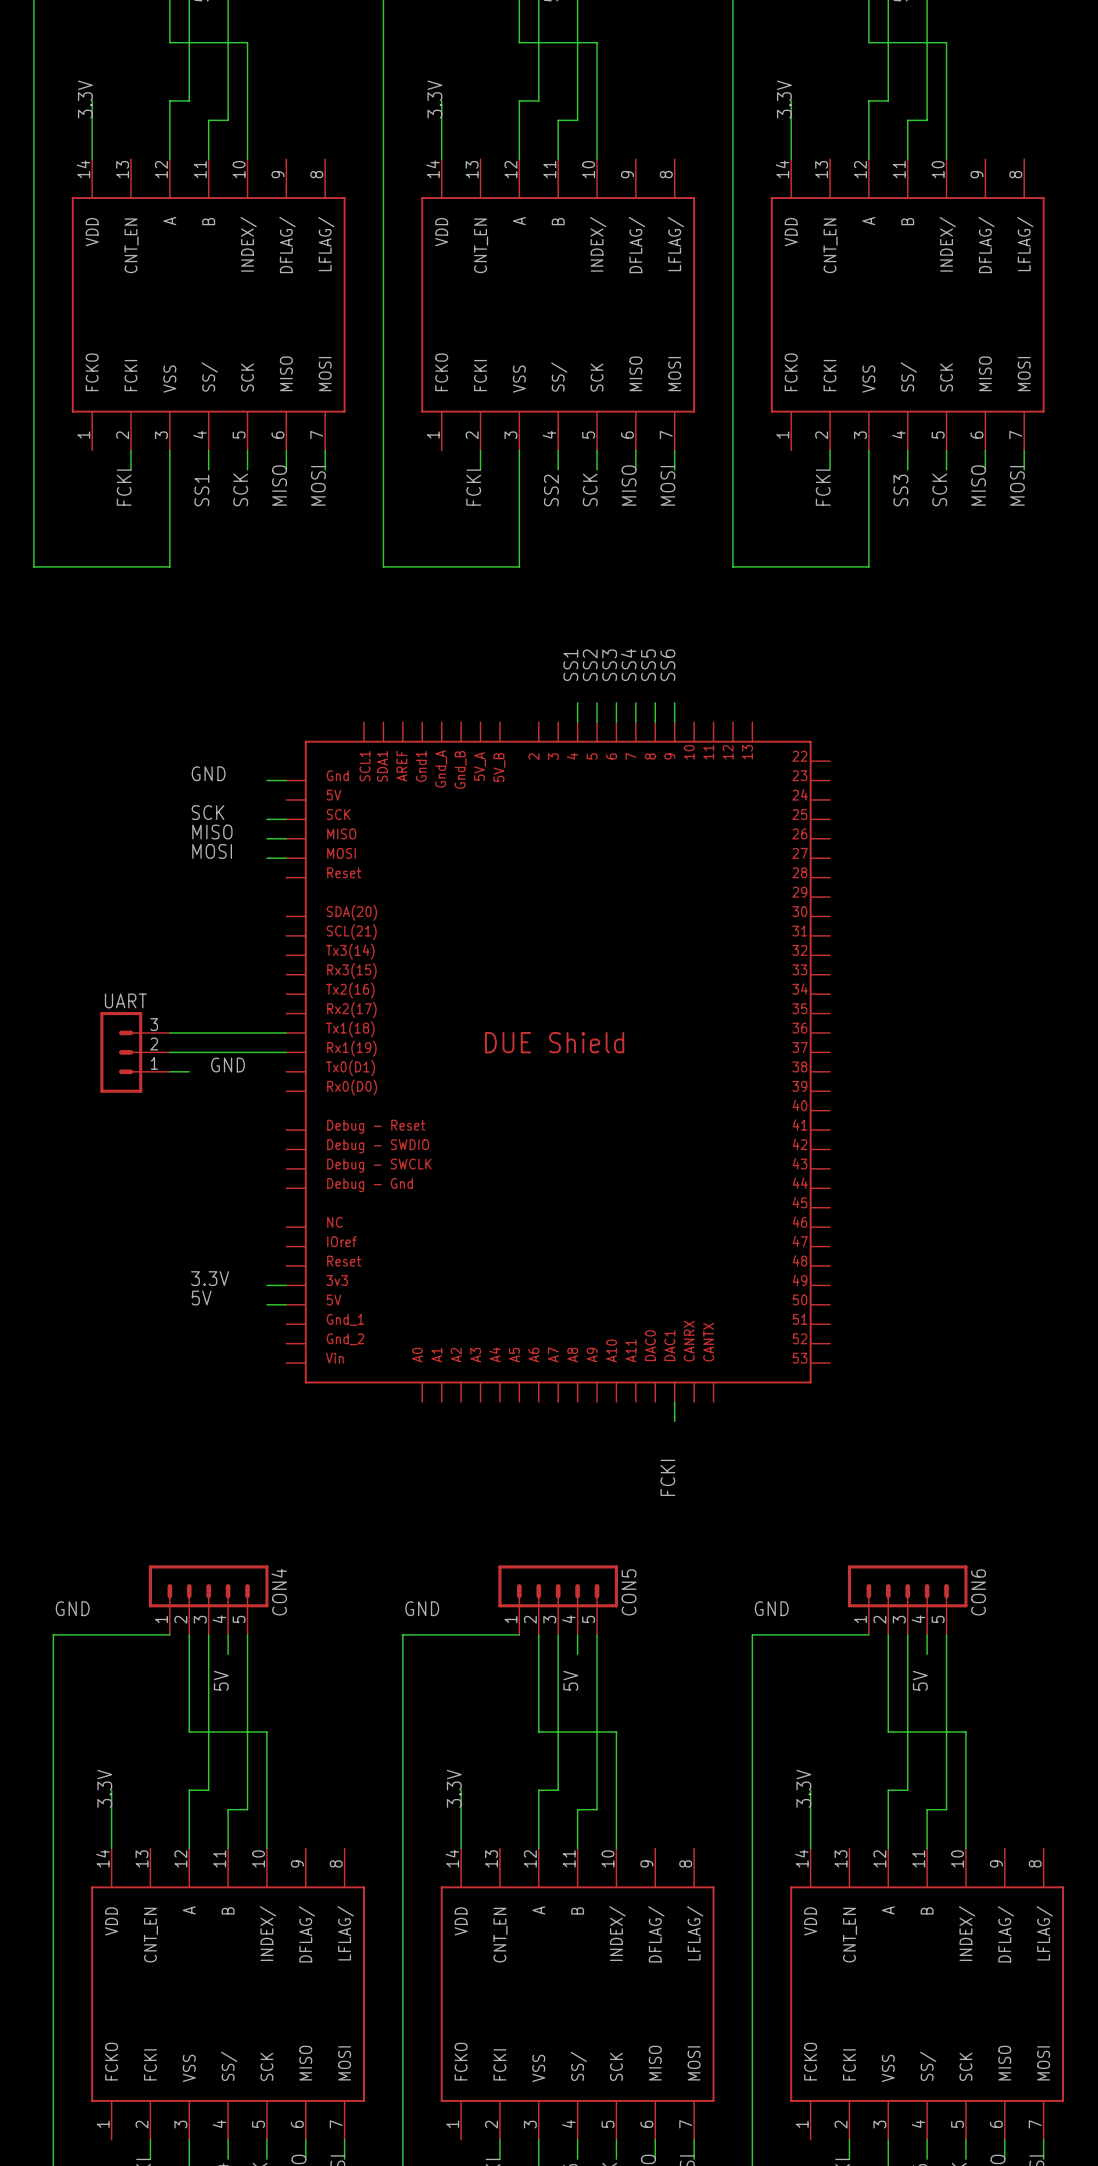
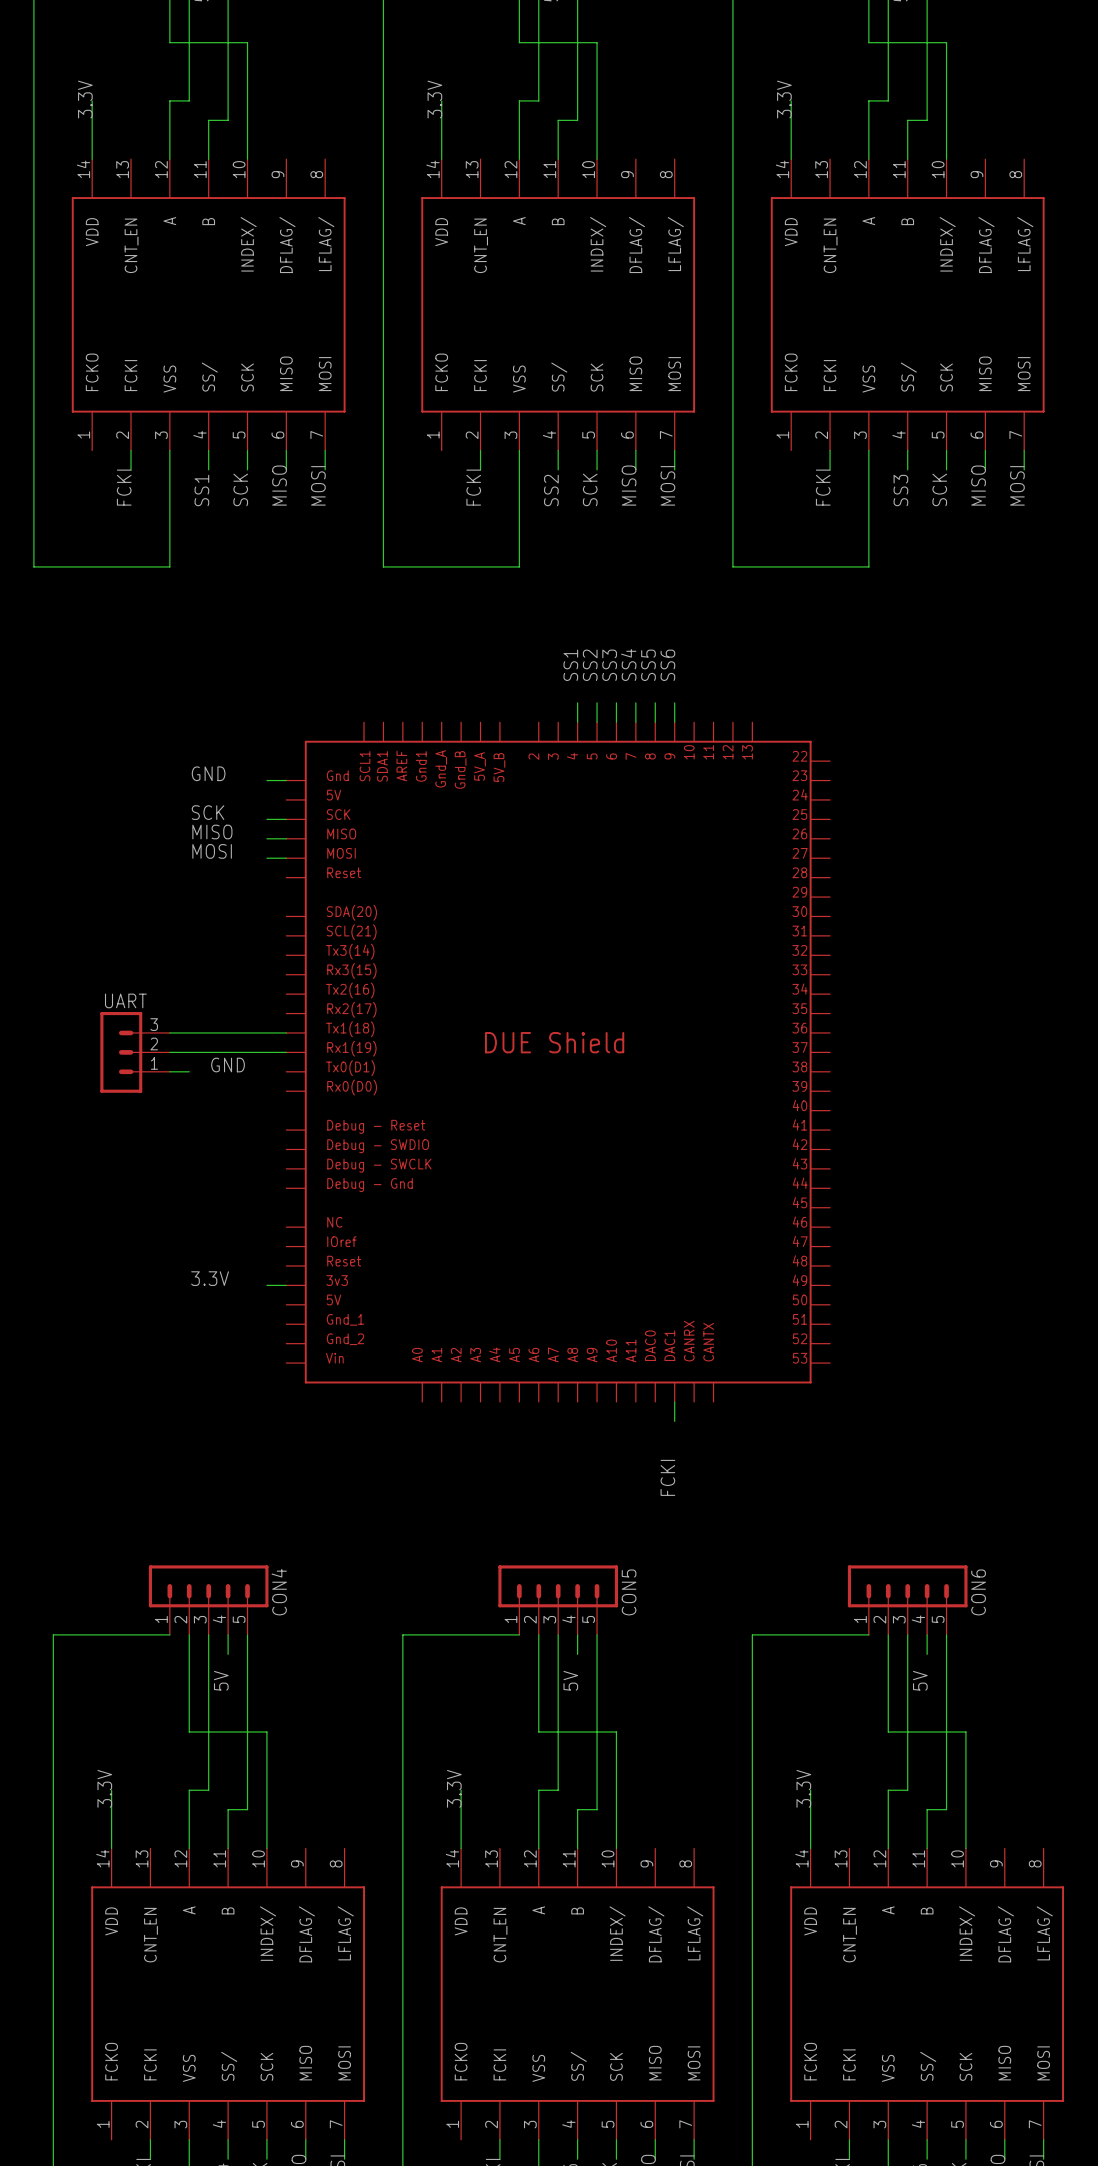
label: 5V (201, 1298) -> none
wire: (266, 1304) (286, 1304) -> none
label: GND (72, 1608) -> none
label: GND (422, 1608) -> none
label: GND (771, 1608) -> none

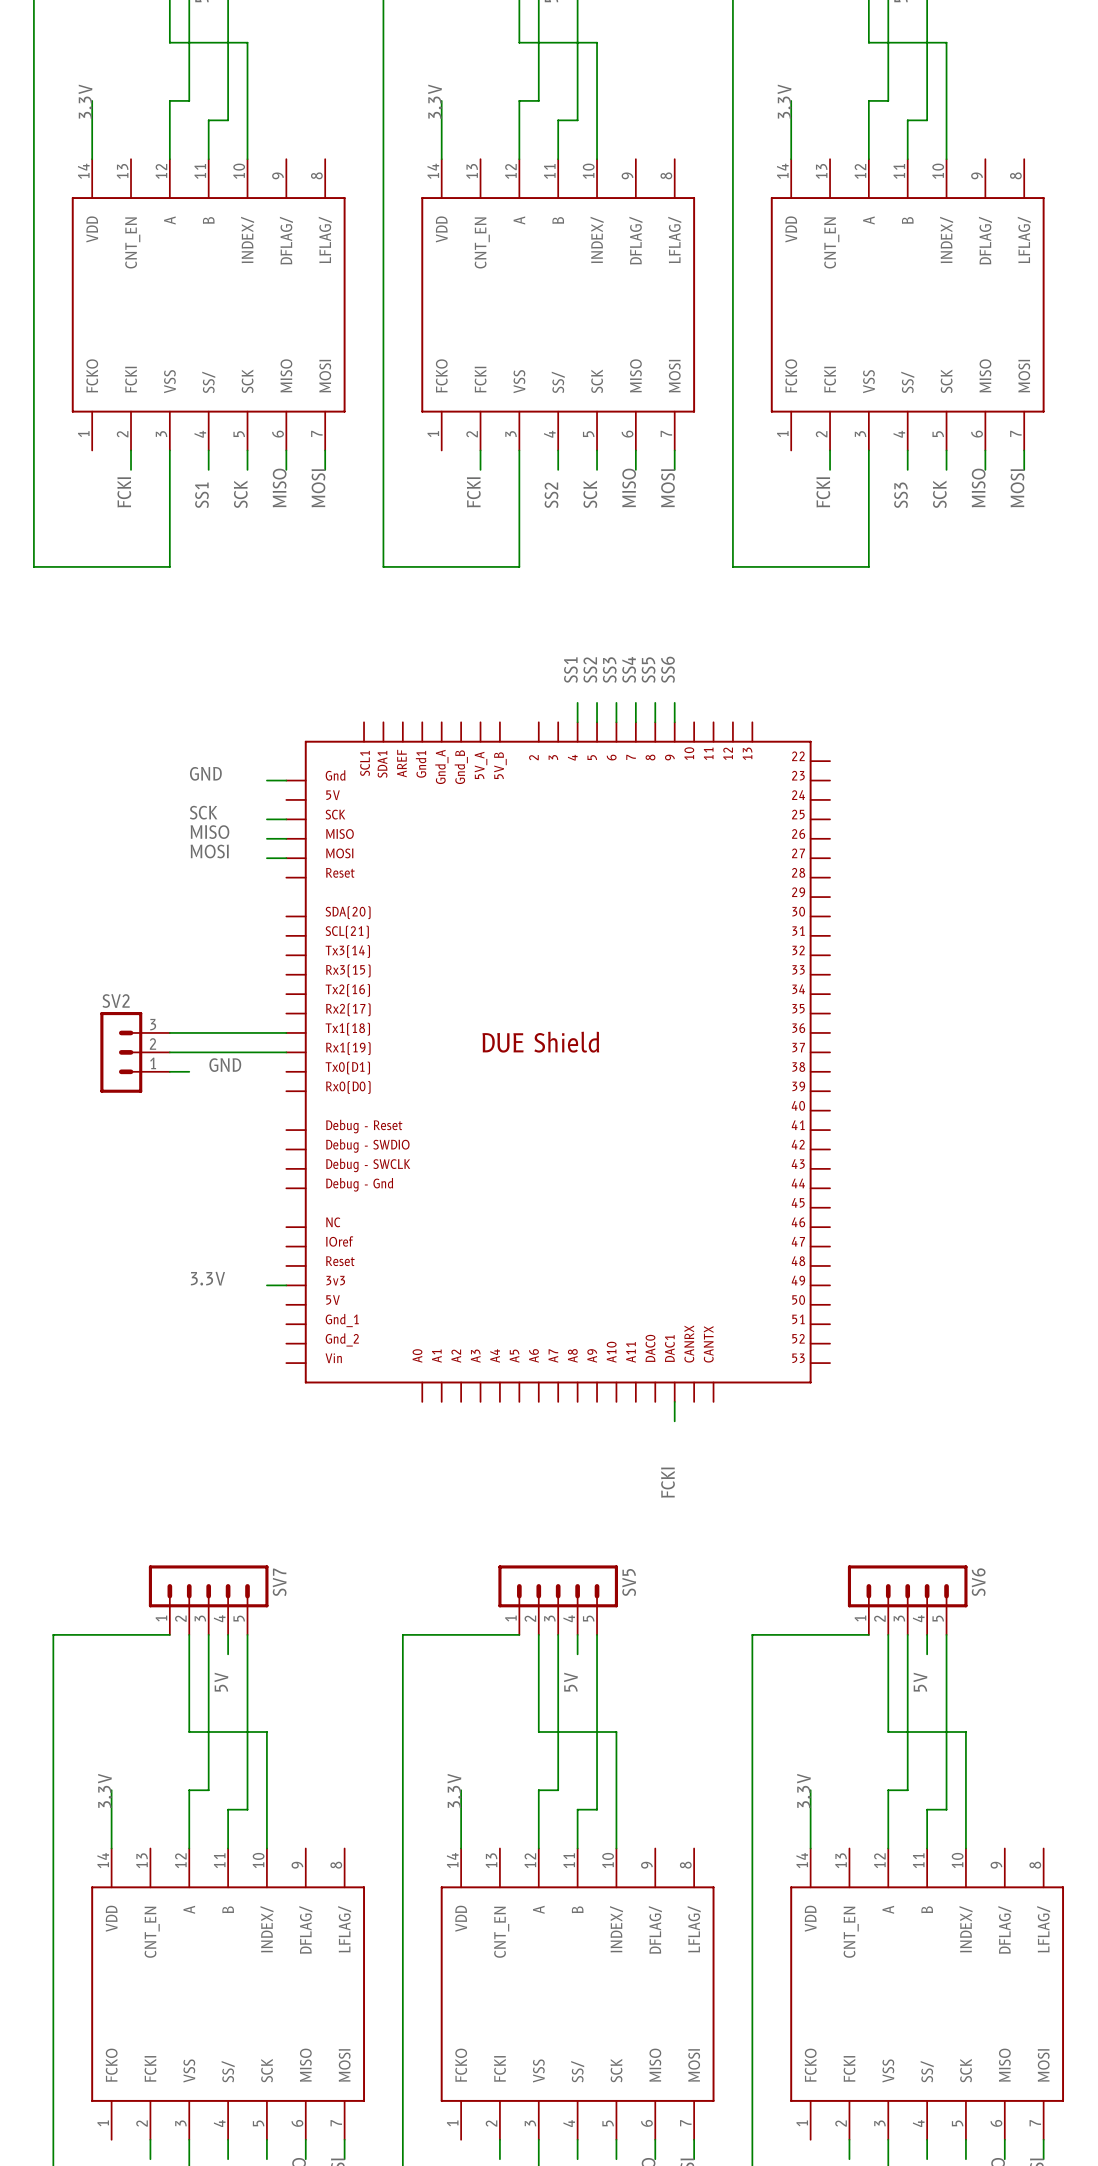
UART name: UART (125, 1000) -> SV2 (116, 1001)
CON4 name: CON4 (279, 1592) -> SV7 (279, 1582)
CON5 name: CON5 (629, 1592) -> SV5 (629, 1582)
CON6 name: CON6 (978, 1592) -> SV6 (978, 1582)

